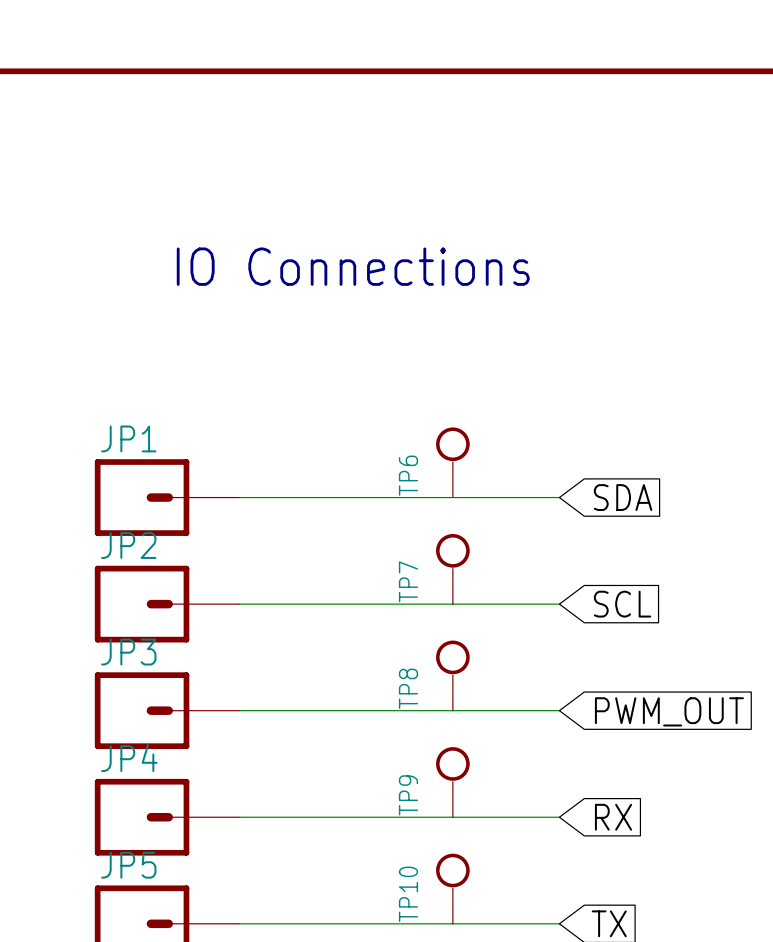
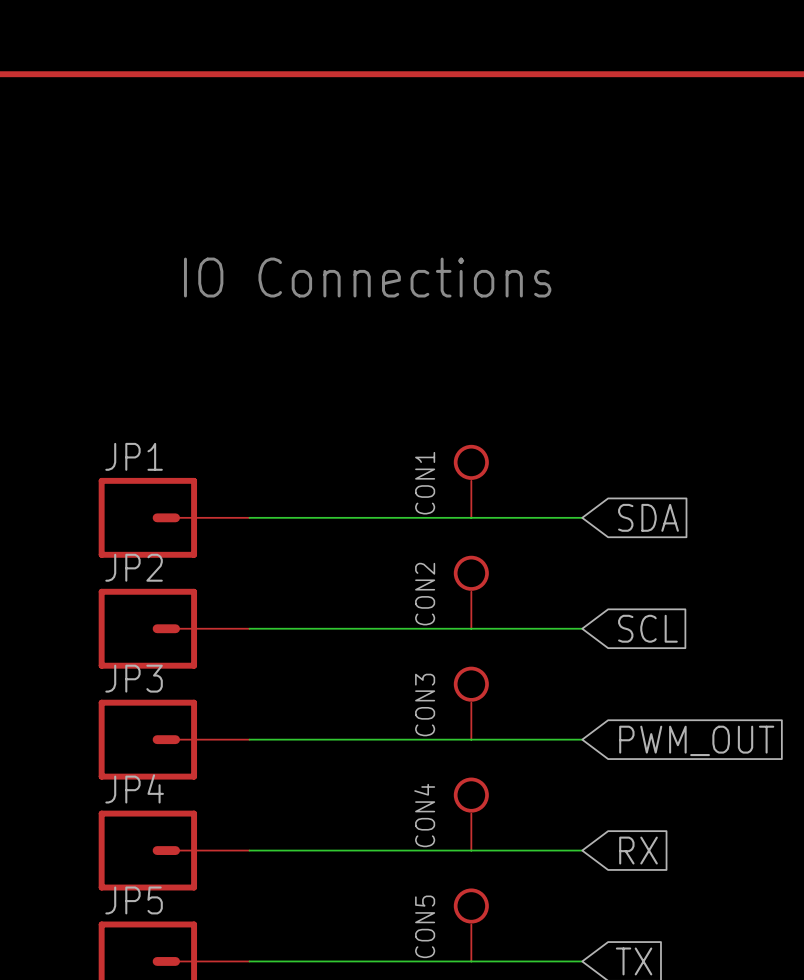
TP6 name: TP6 (408, 475) -> CON1 (425, 483)
TP7 name: TP7 (408, 581) -> CON2 (425, 594)
TP8 name: TP8 (408, 688) -> CON3 (425, 705)
TP9 name: TP9 (408, 795) -> CON4 (424, 815)
TP10 name: TP10 (408, 894) -> CON5 (425, 926)

